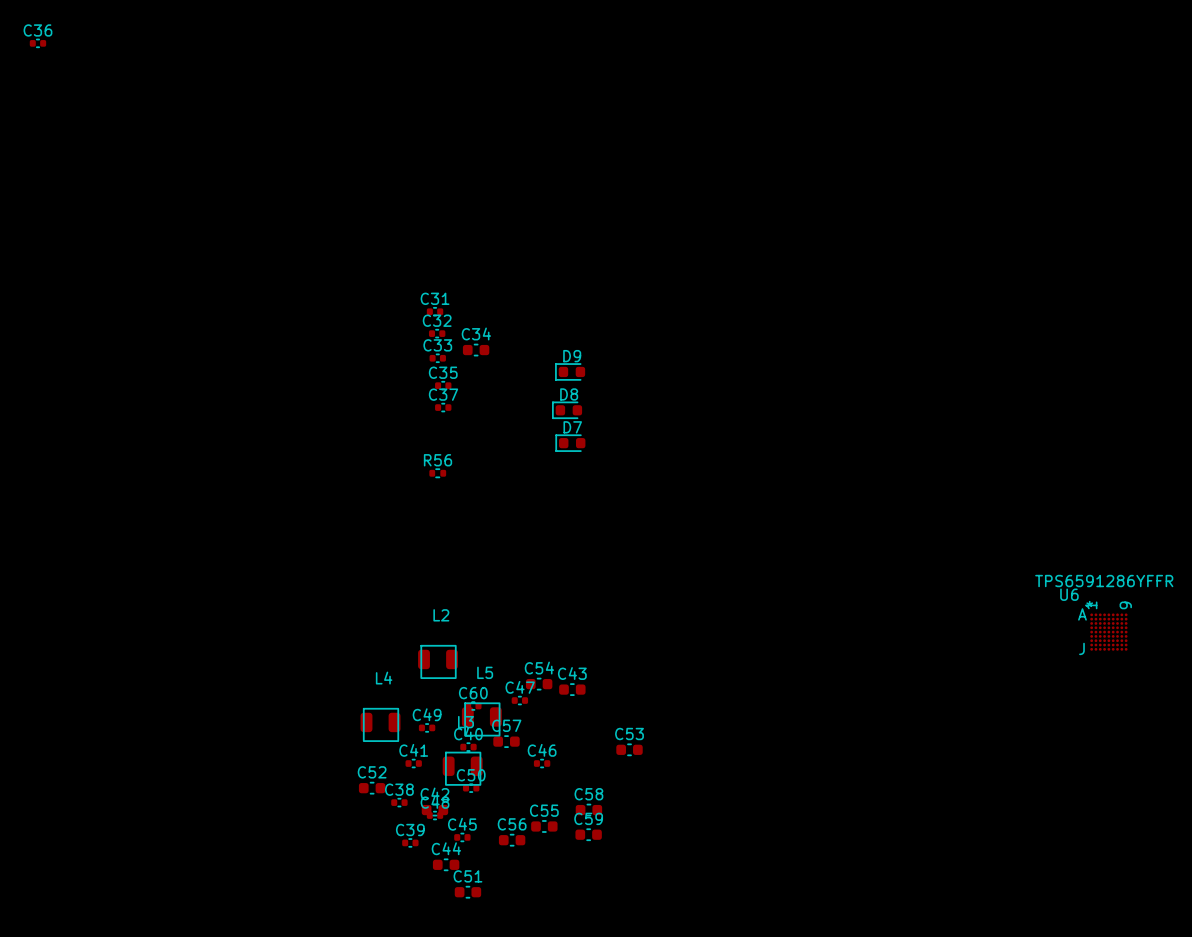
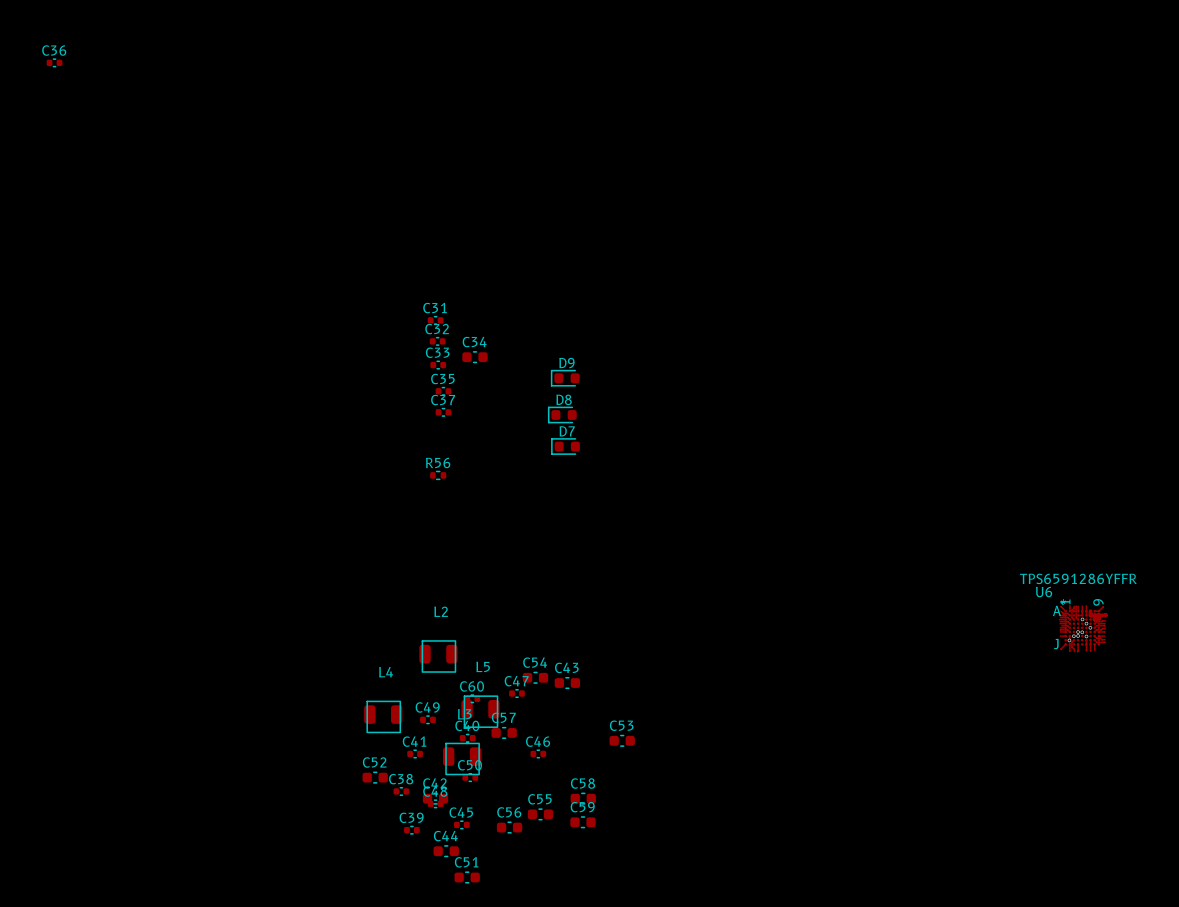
track: none -> (1069, 605) (1069, 611)
track: none -> (1074, 606) (1071, 610) (1071, 617) (1074, 619)
track: none -> (1076, 606) (1076, 617) (1078, 619)
track: none -> (1078, 606) (1078, 611)
track: none -> (1082, 606) (1082, 615) (1078, 615)
track: none -> (1086, 606) (1086, 615)
track: none -> (1061, 606) (1065, 611)
track: none -> (1103, 606) (1098, 611) (1094, 611)
track: none -> (1090, 611) (1090, 615) (1105, 614)
track: none -> (1061, 611) (1069, 615)
track: none -> (1059, 615) (1065, 615)
track: none -> (1094, 615) (1094, 619) (1098, 615) (1098, 618) (1095, 618)
track: none -> (1060, 617) (1067, 617) (1069, 619)
track: none -> (1059, 619) (1065, 619)
via: none -> (1082, 619)
track: none -> (1105, 620) (1096, 621) (1094, 623)
track: none -> (1060, 621) (1067, 621) (1069, 623)
track: none -> (1060, 623) (1065, 623)
via: none -> (1086, 623)
track: none -> (1104, 623) (1098, 623)
track: none -> (1061, 625) (1069, 627)
track: none -> (1104, 625) (1096, 625) (1094, 627)
track: none -> (1060, 627) (1065, 627)
via: none -> (1090, 627)
track: none -> (1105, 628) (1094, 631)
track: none -> (1060, 629) (1067, 629) (1069, 631)
track: none -> (1060, 631) (1065, 631)
via: none -> (1078, 632)
via: none -> (1082, 632)
track: none -> (1098, 631) (1104, 631)
track: none -> (1060, 636) (1065, 636)
track: none -> (1069, 636) (1069, 640)
via: none -> (1073, 636)
via: none -> (1078, 635)
track: none -> (1094, 636) (1105, 639)
track: none -> (1098, 636) (1104, 636)
via: none -> (1086, 636)
via: none -> (1069, 640)
track: none -> (1074, 640) (1071, 646) (1074, 651)
track: none -> (1086, 640) (1086, 650)
track: none -> (1090, 640) (1090, 651)
track: none -> (1094, 640) (1096, 642) (1104, 642)
track: none -> (1065, 644) (1060, 649)
track: none -> (1069, 644) (1069, 651)
track: none -> (1078, 644) (1077, 651)
track: none -> (1094, 644) (1094, 650)

